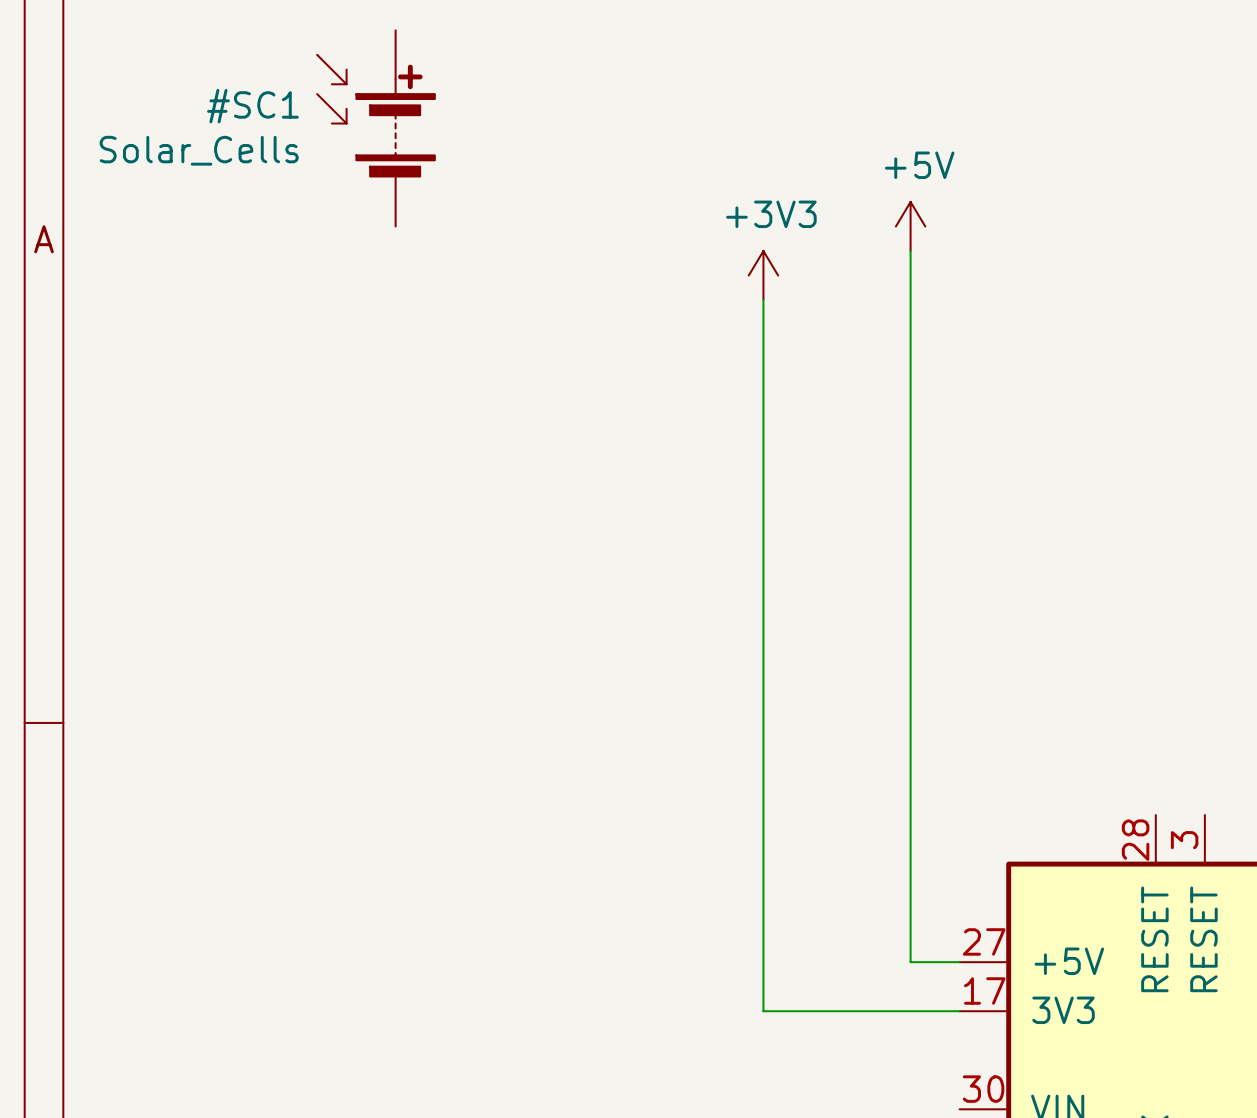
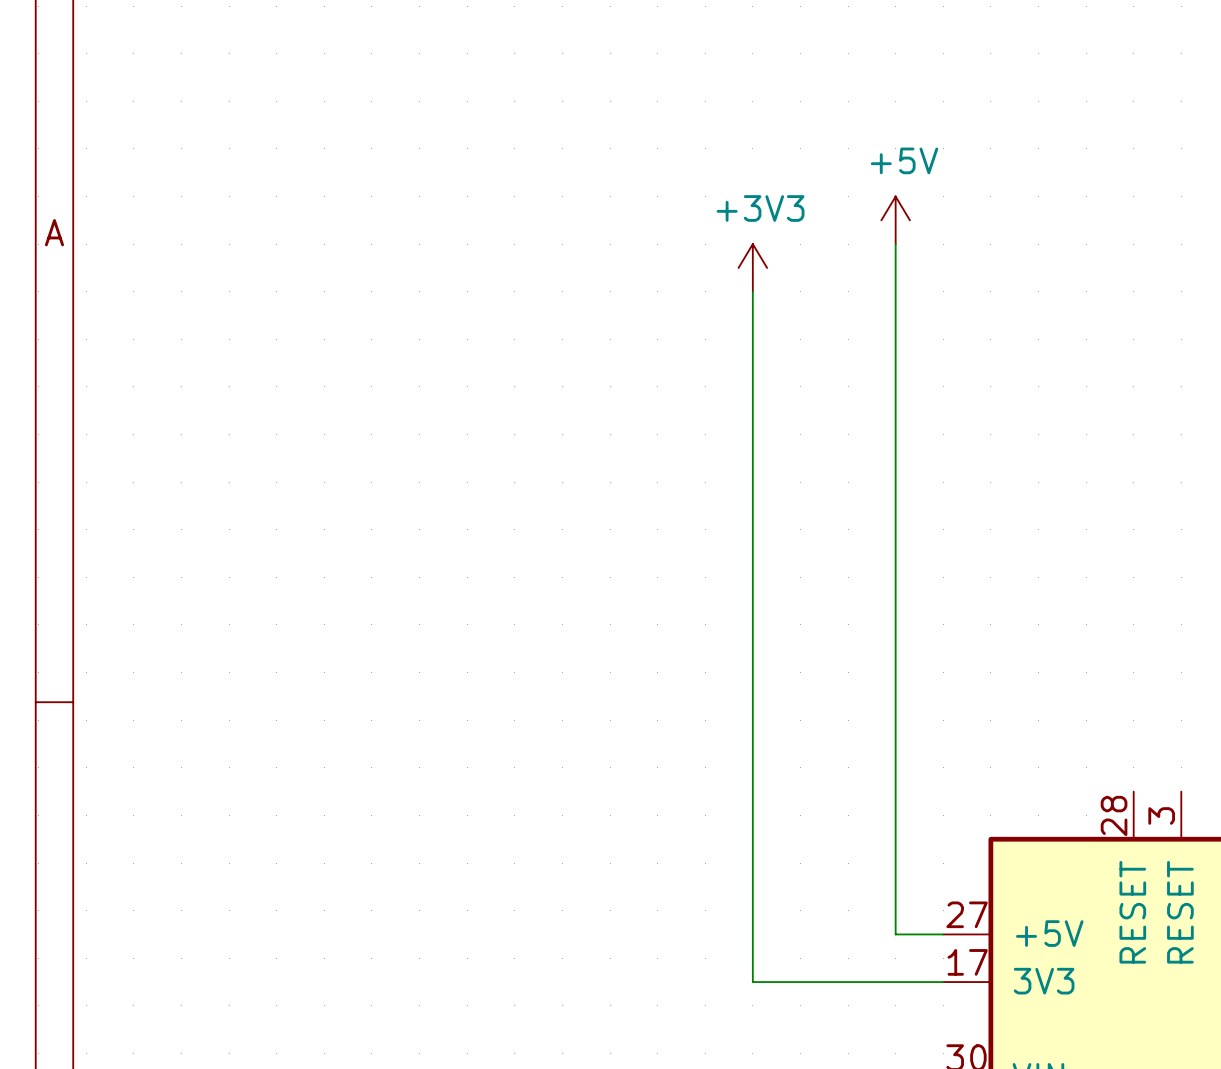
#SC1: Solar_Cells (376, 128) -> none

